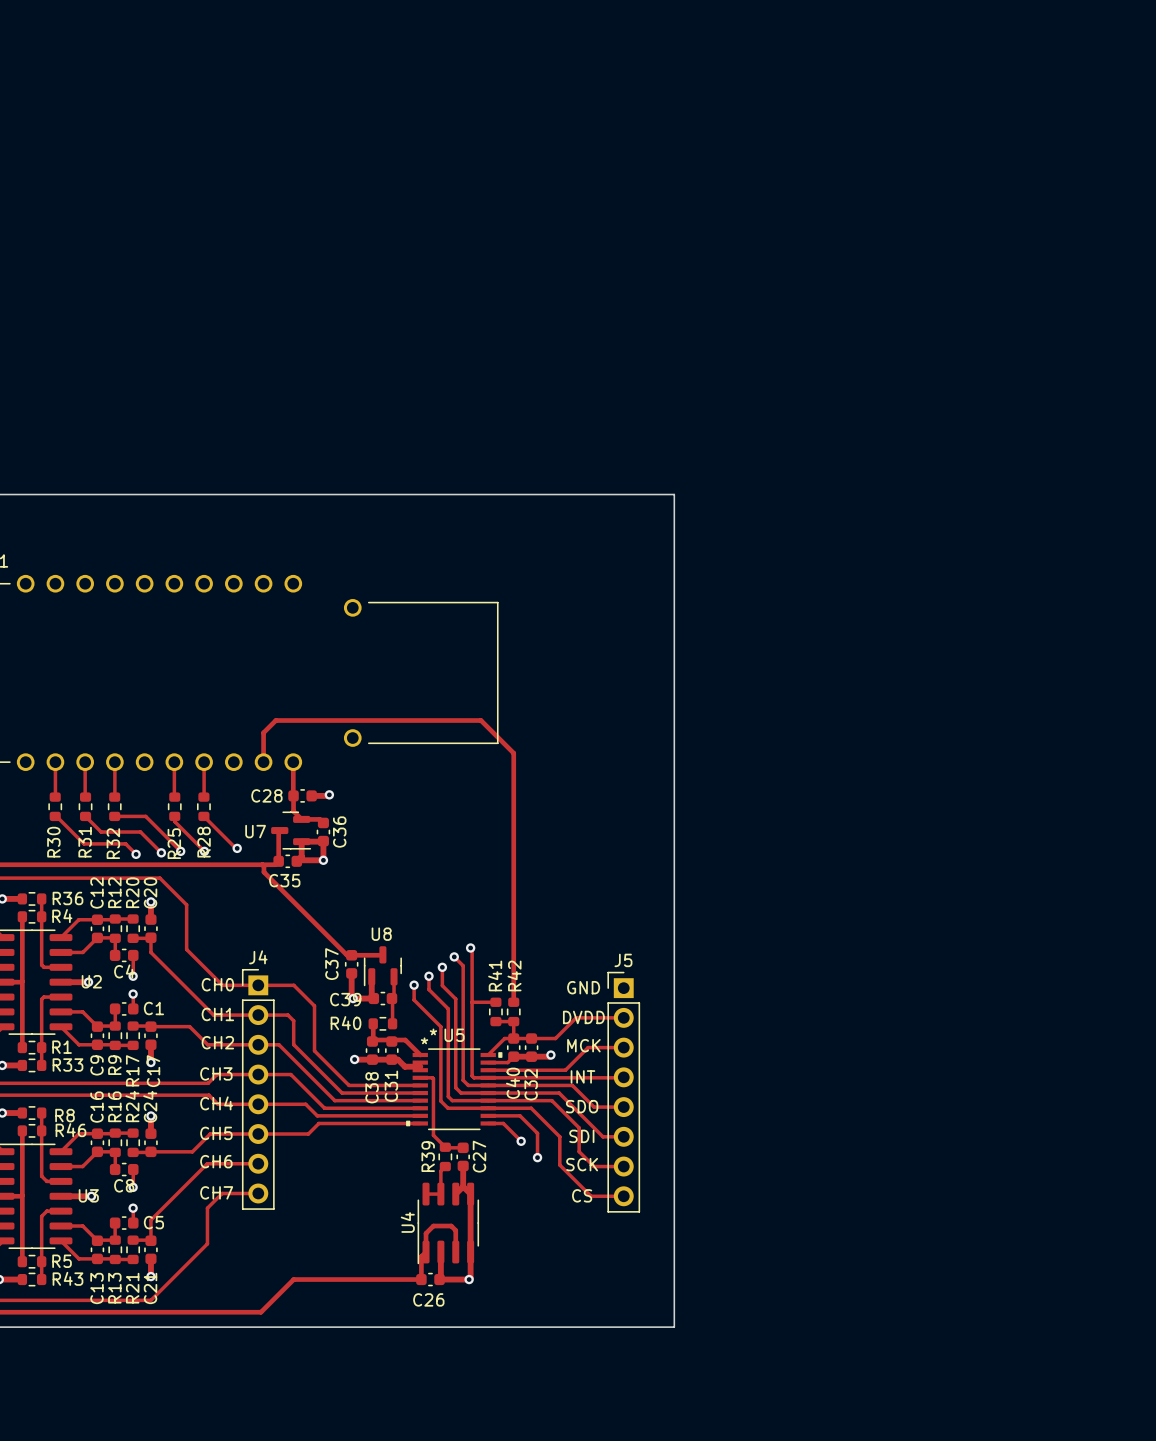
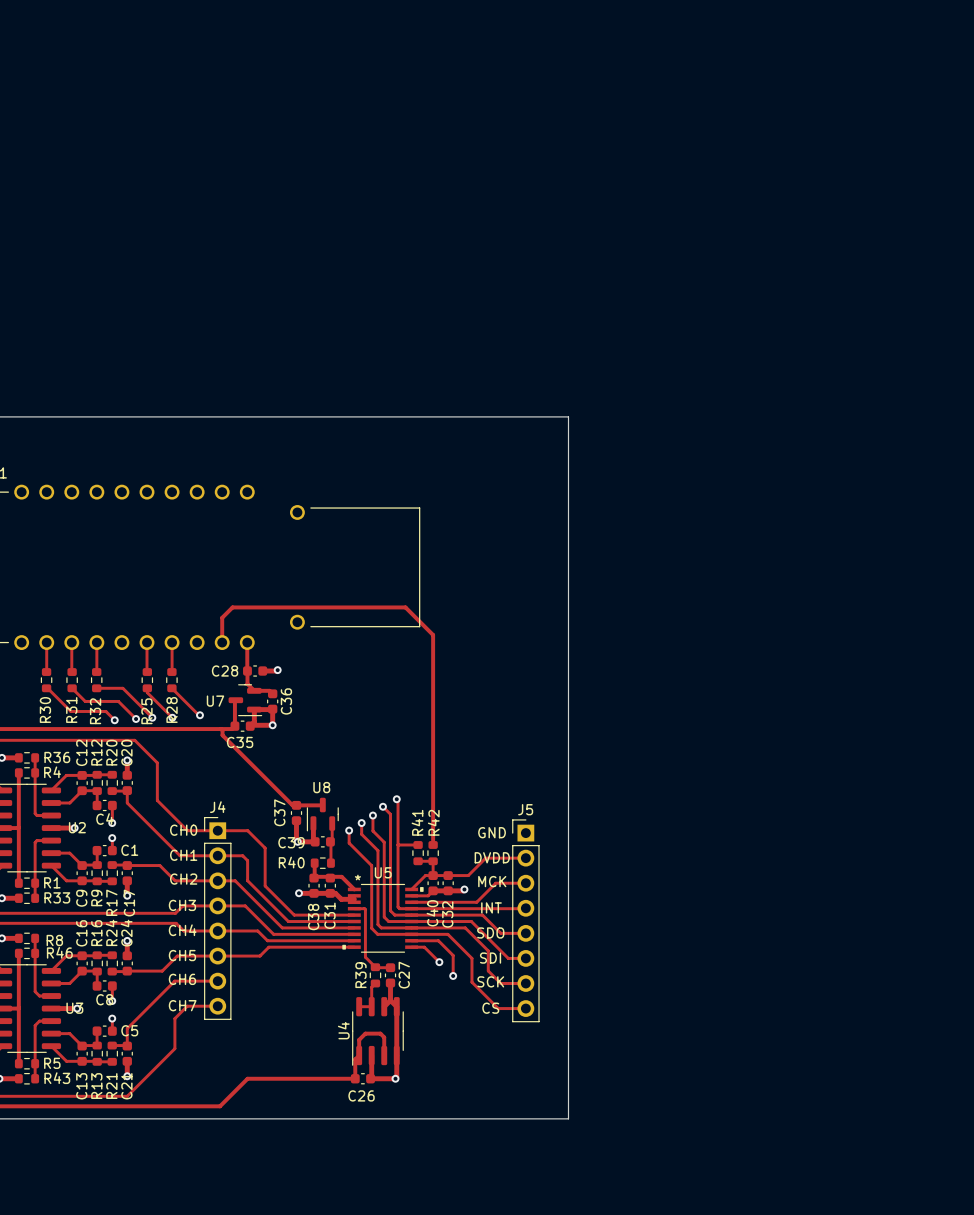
U5 text: * (433, 1031) -> none

